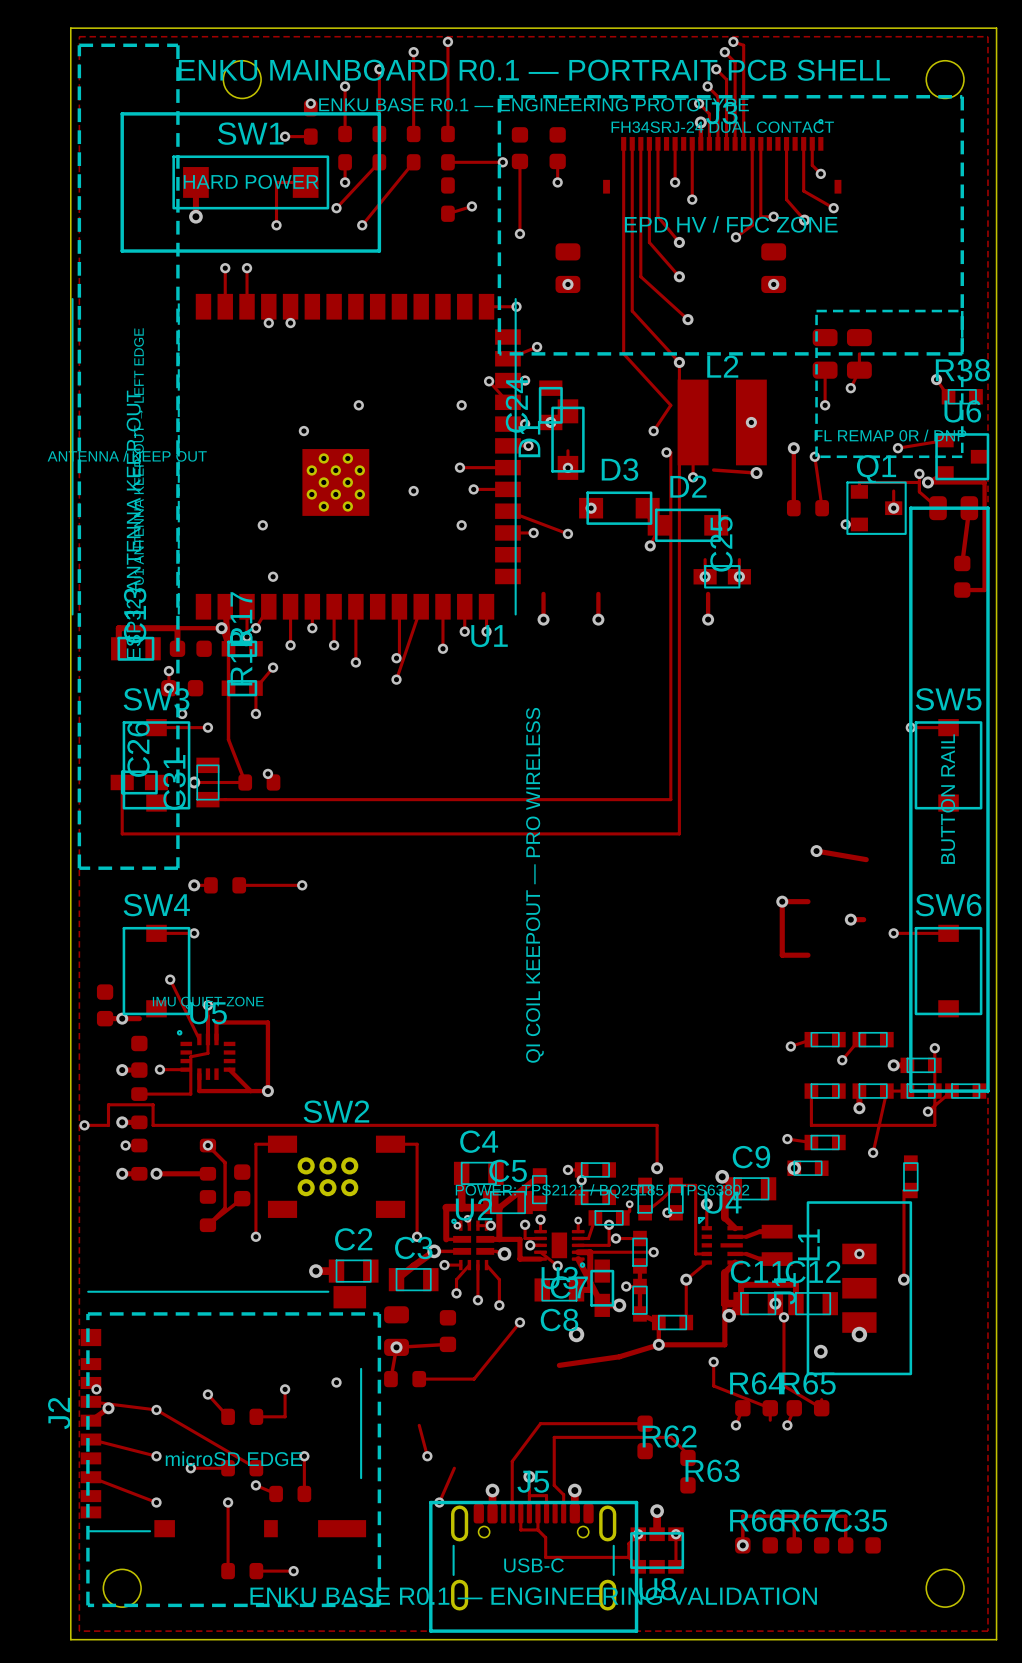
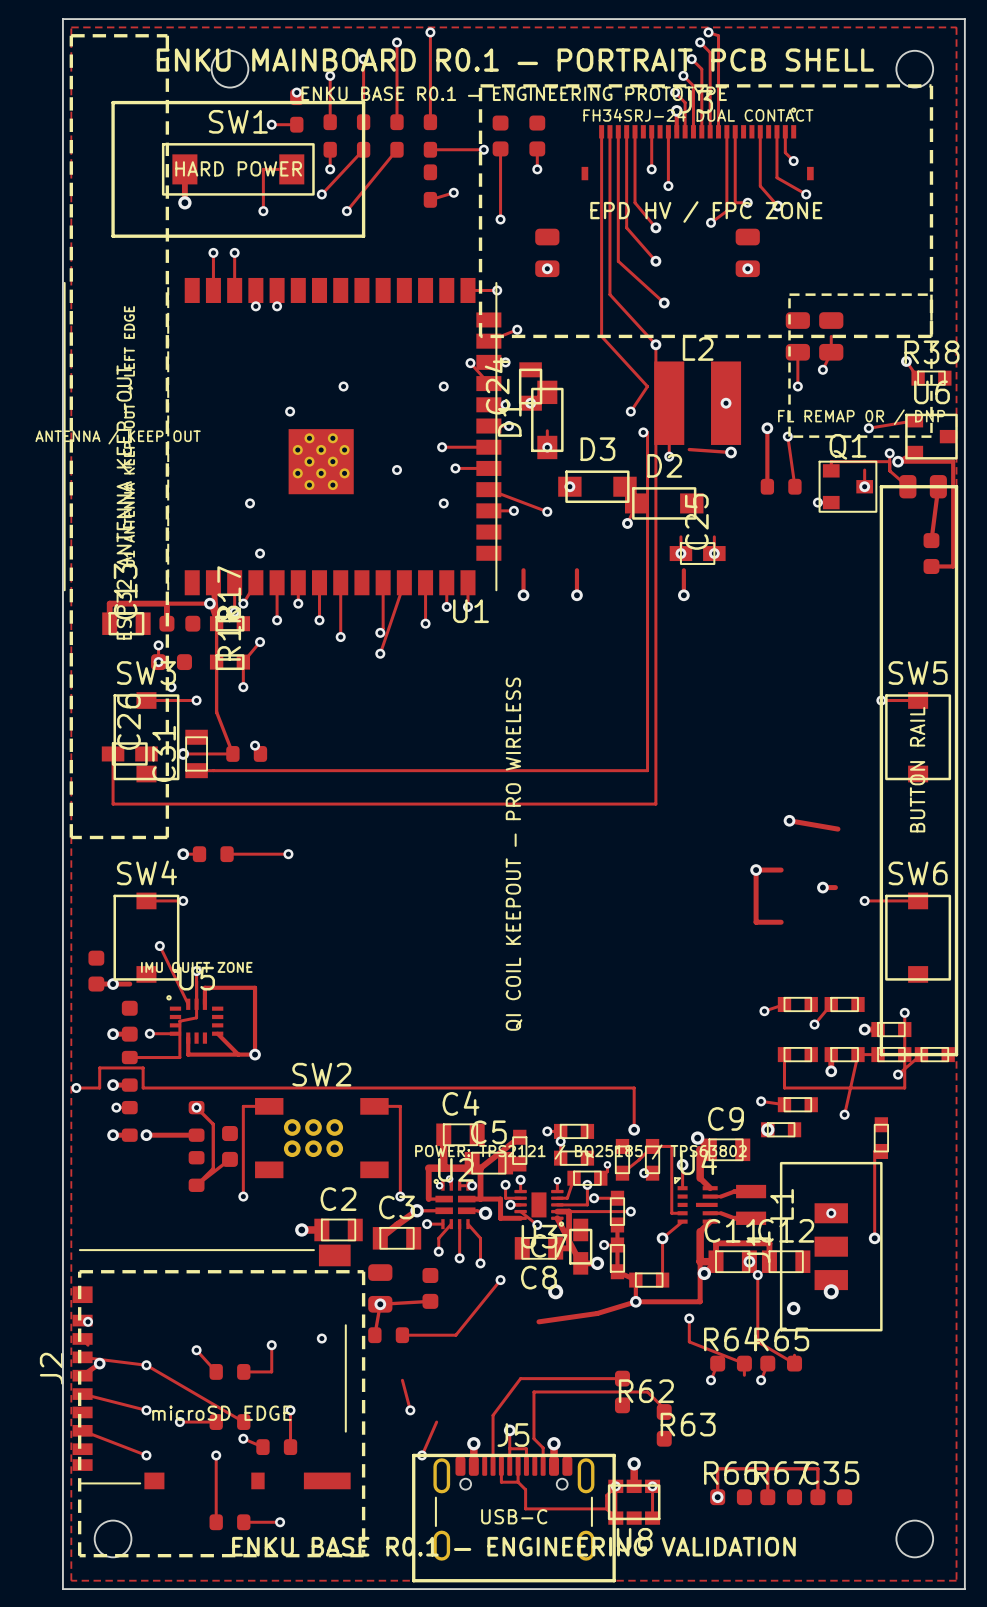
via position: (96, 1389) -> (88, 1321)

